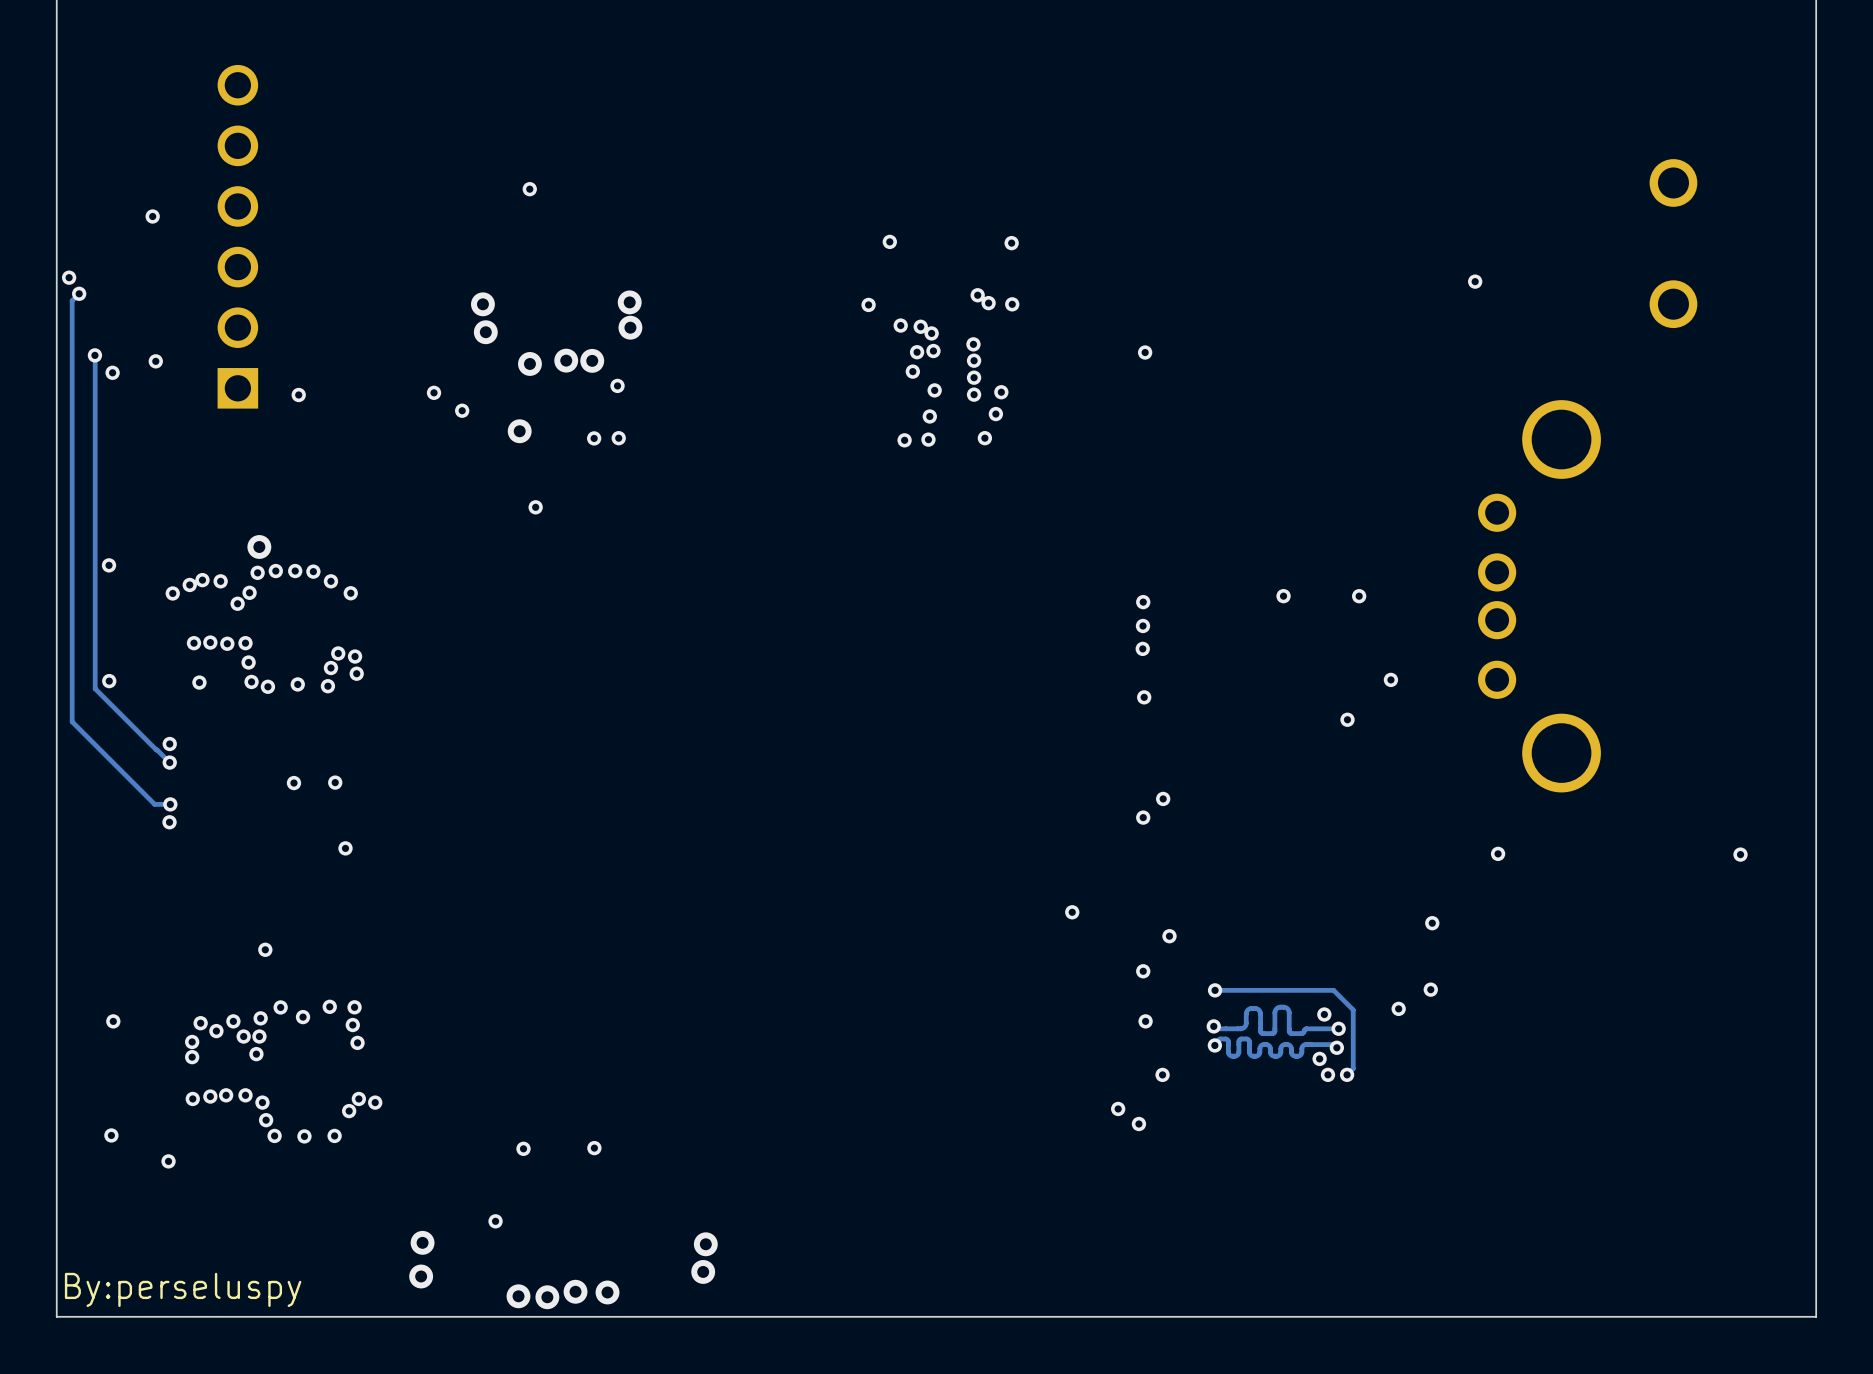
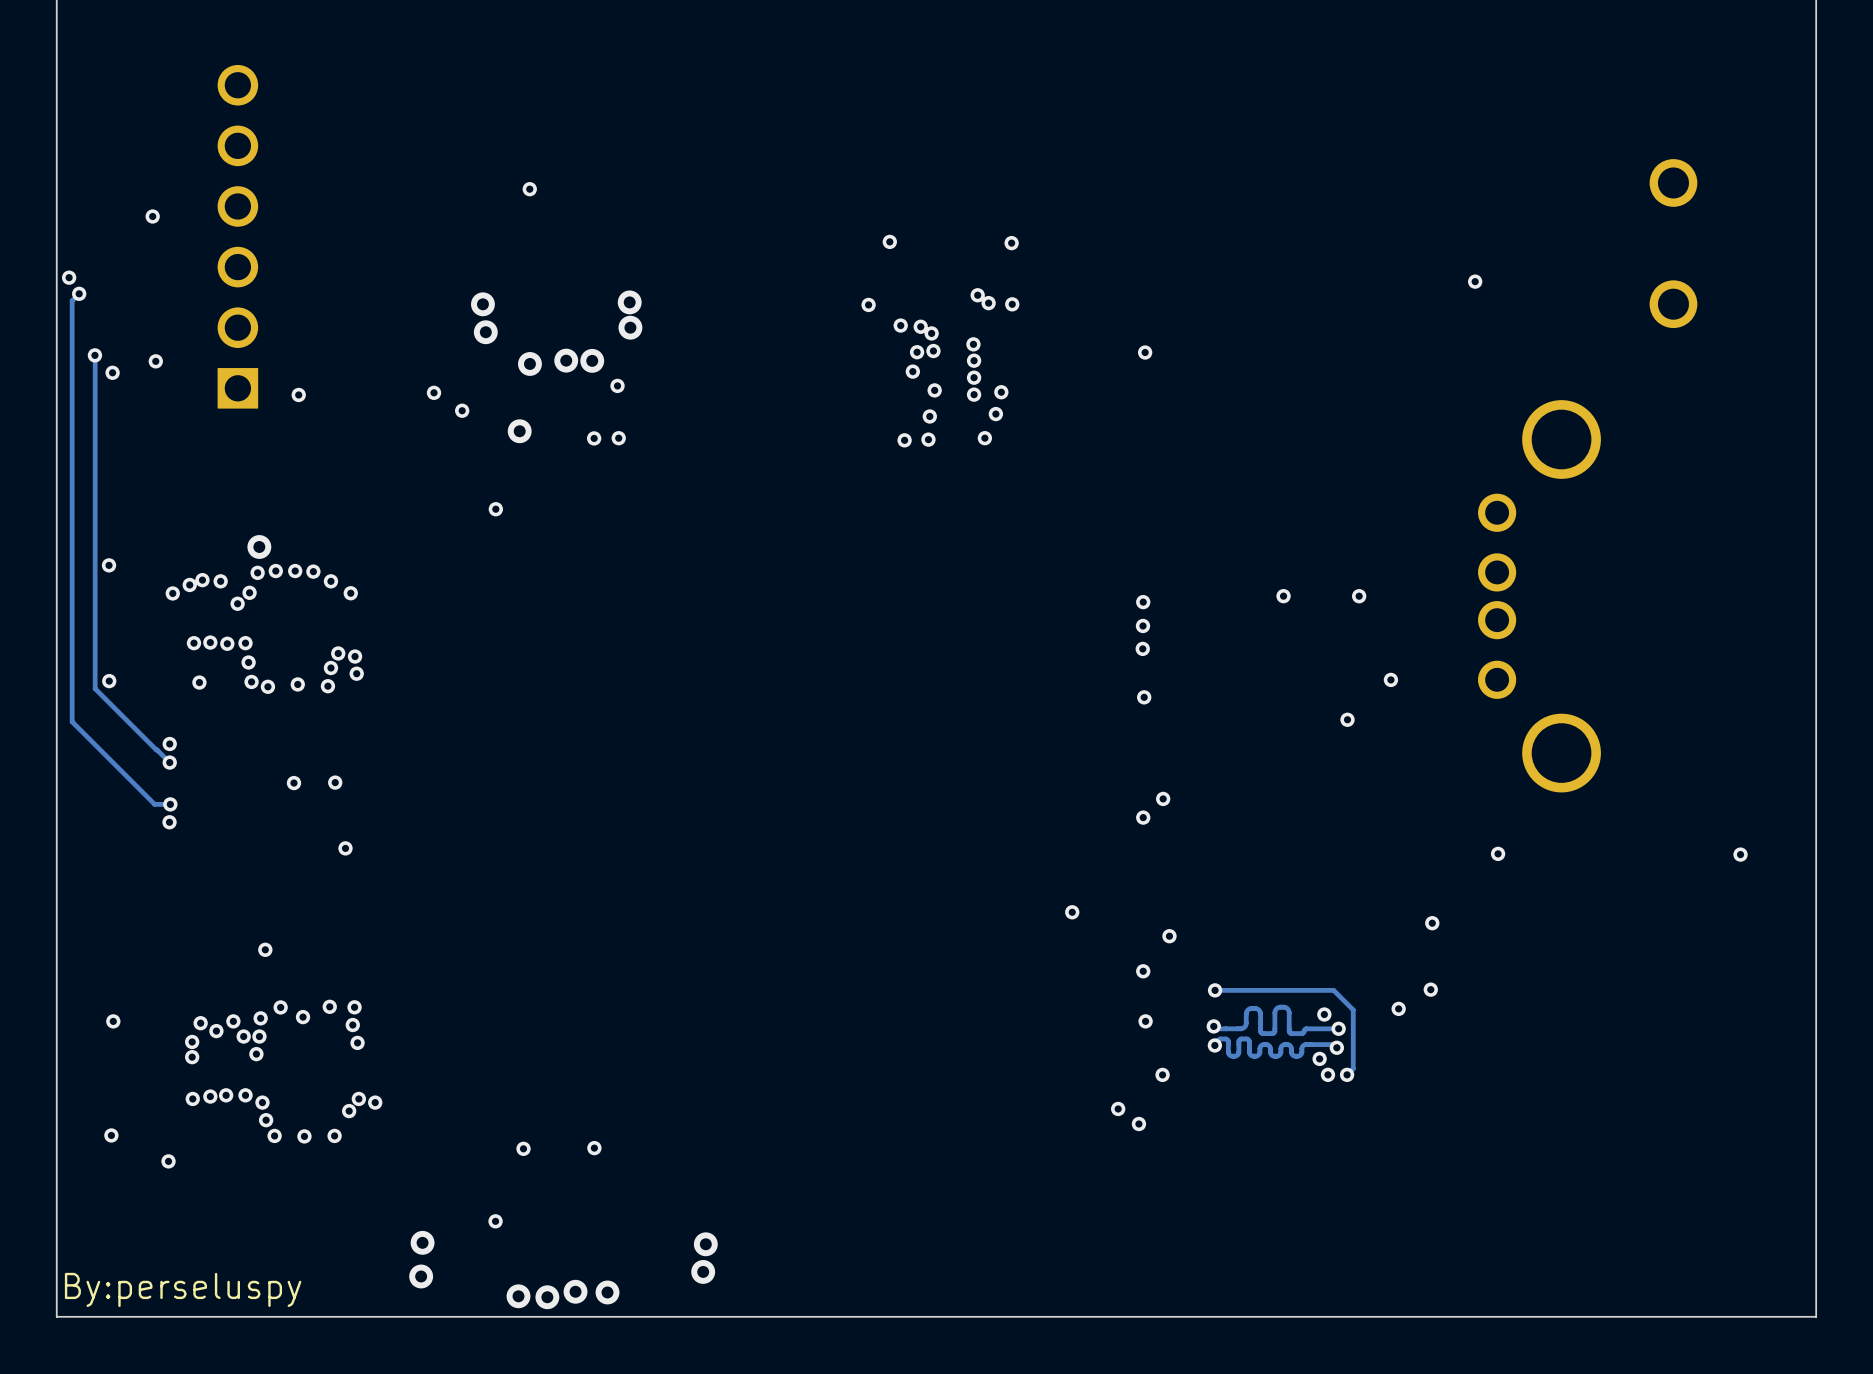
via position: (535, 507) -> (495, 509)

